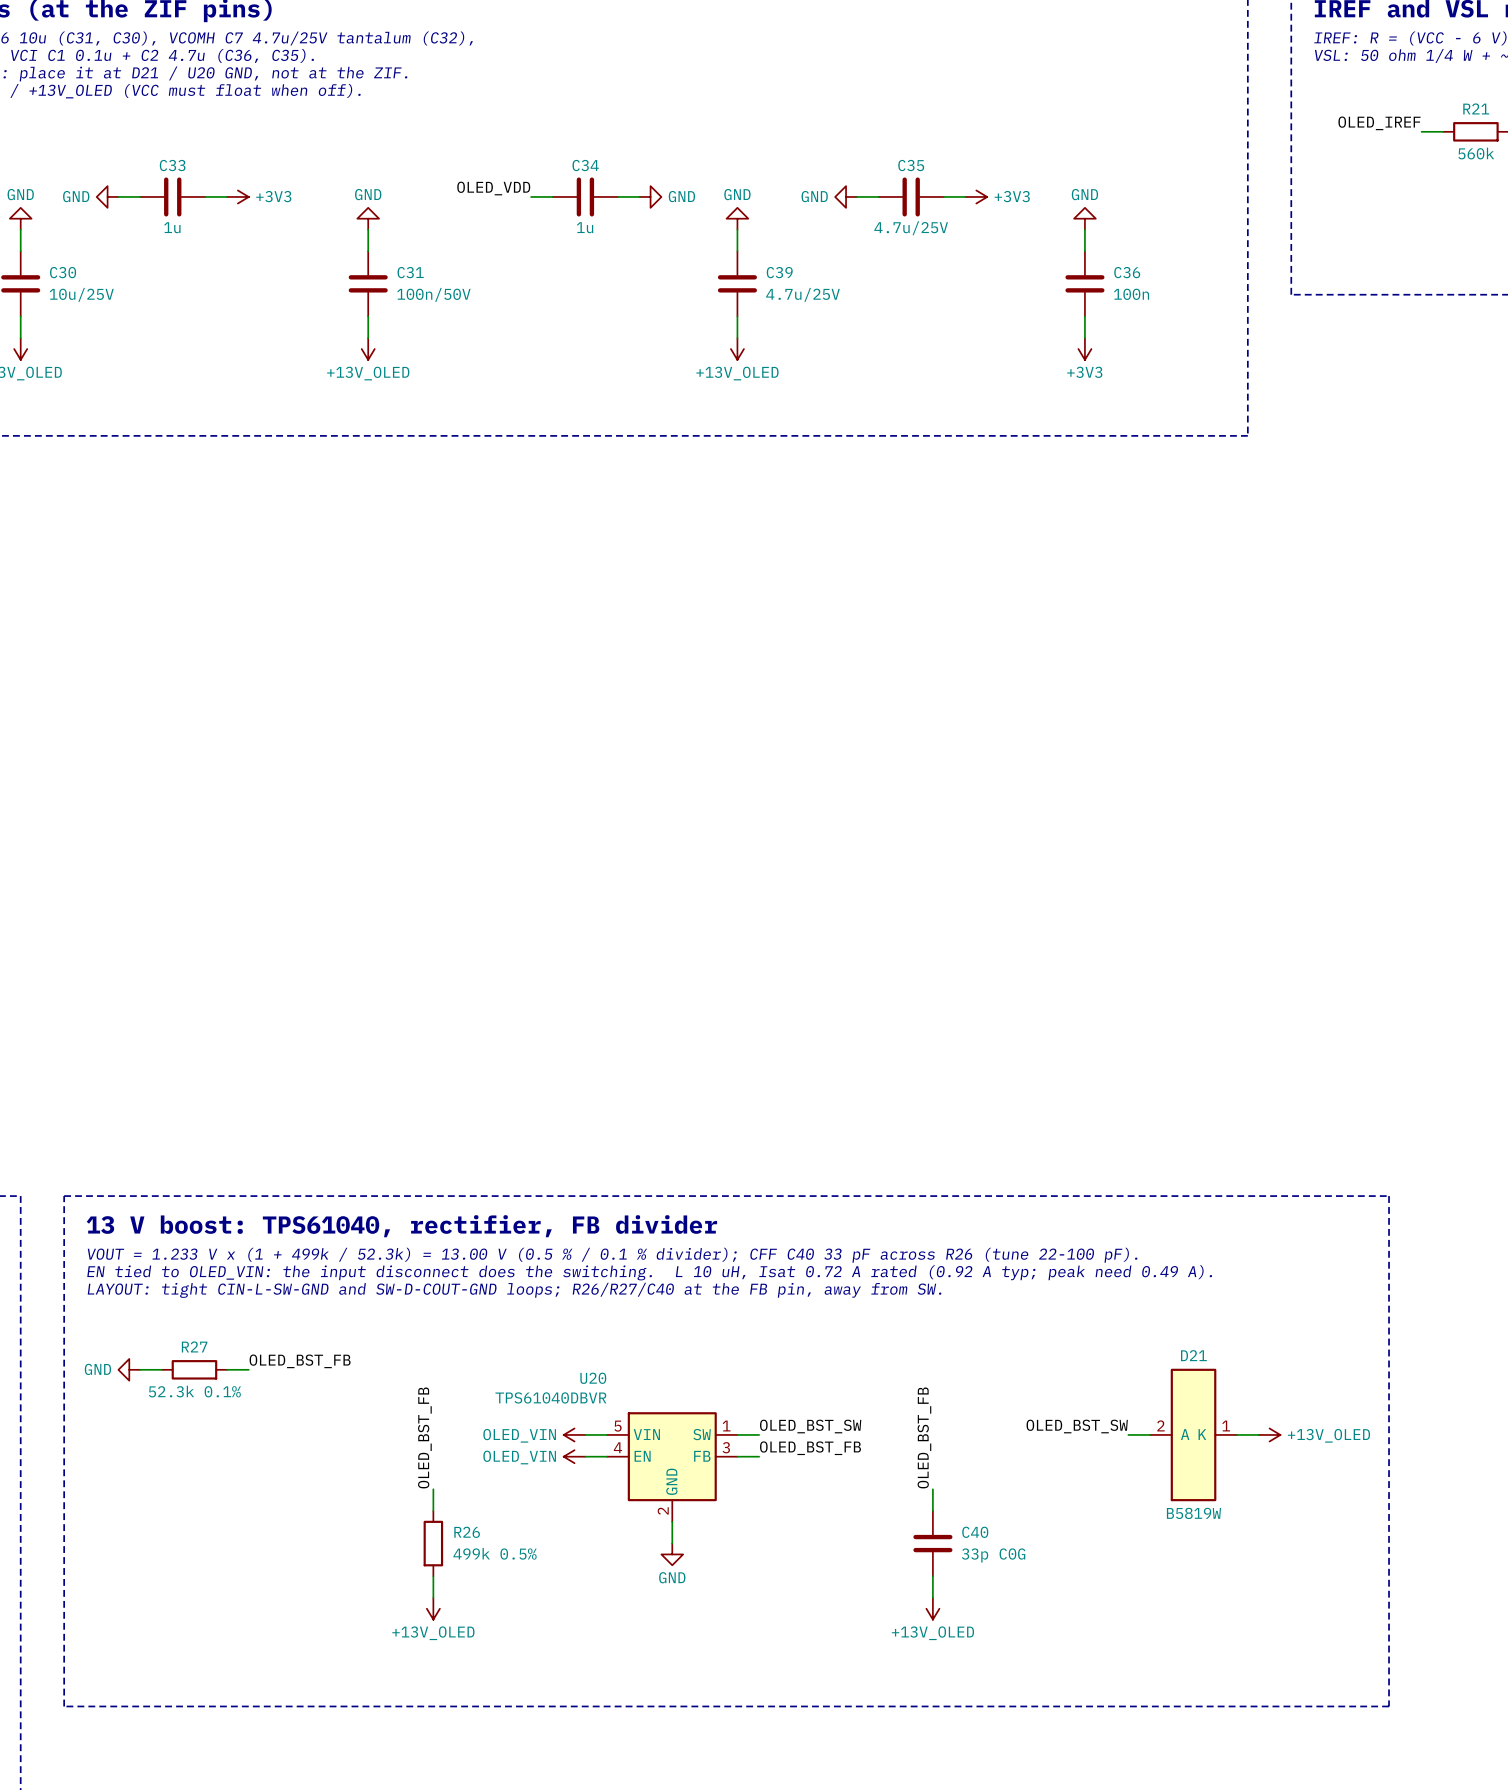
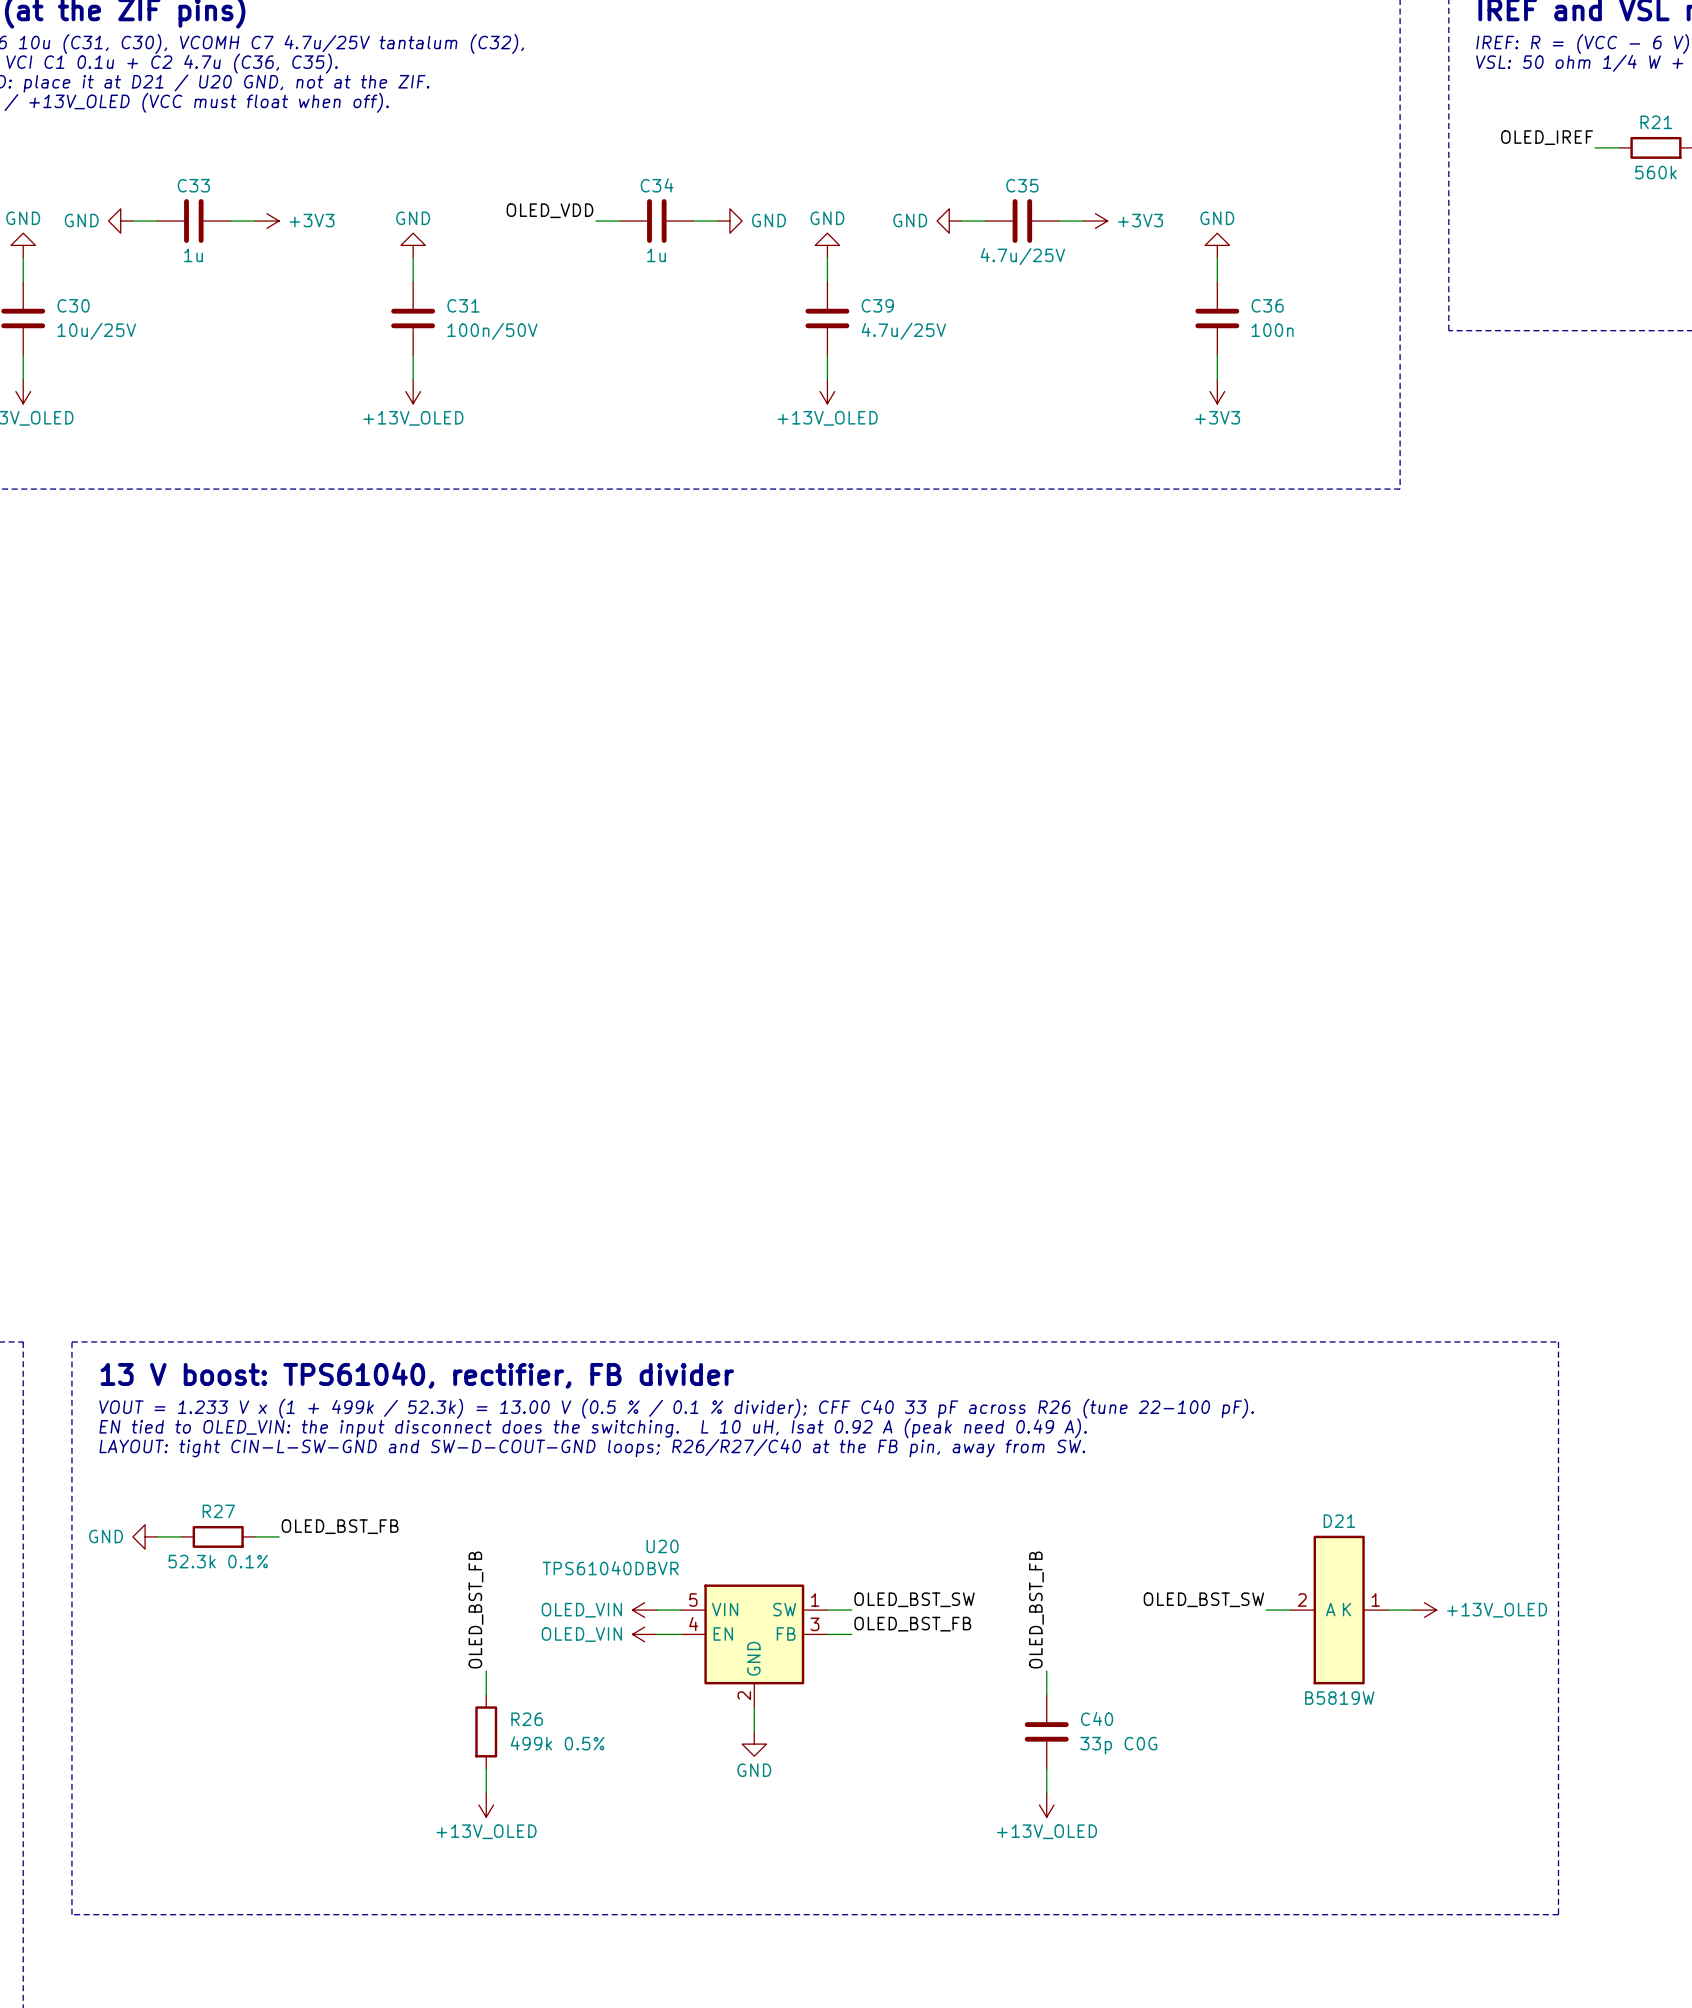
text: EN tied to OLED_VIN: the input disconnect does the switching. L 10 uH, Isat 0.72 A rated (0.92 A typ; peak need 0.49 A). (649, 1272) -> EN tied to OLED_VIN: the input disconnect does the switching. L 10 uH, Isat 0.92 A (peak need 0.49 A). (593, 1428)

